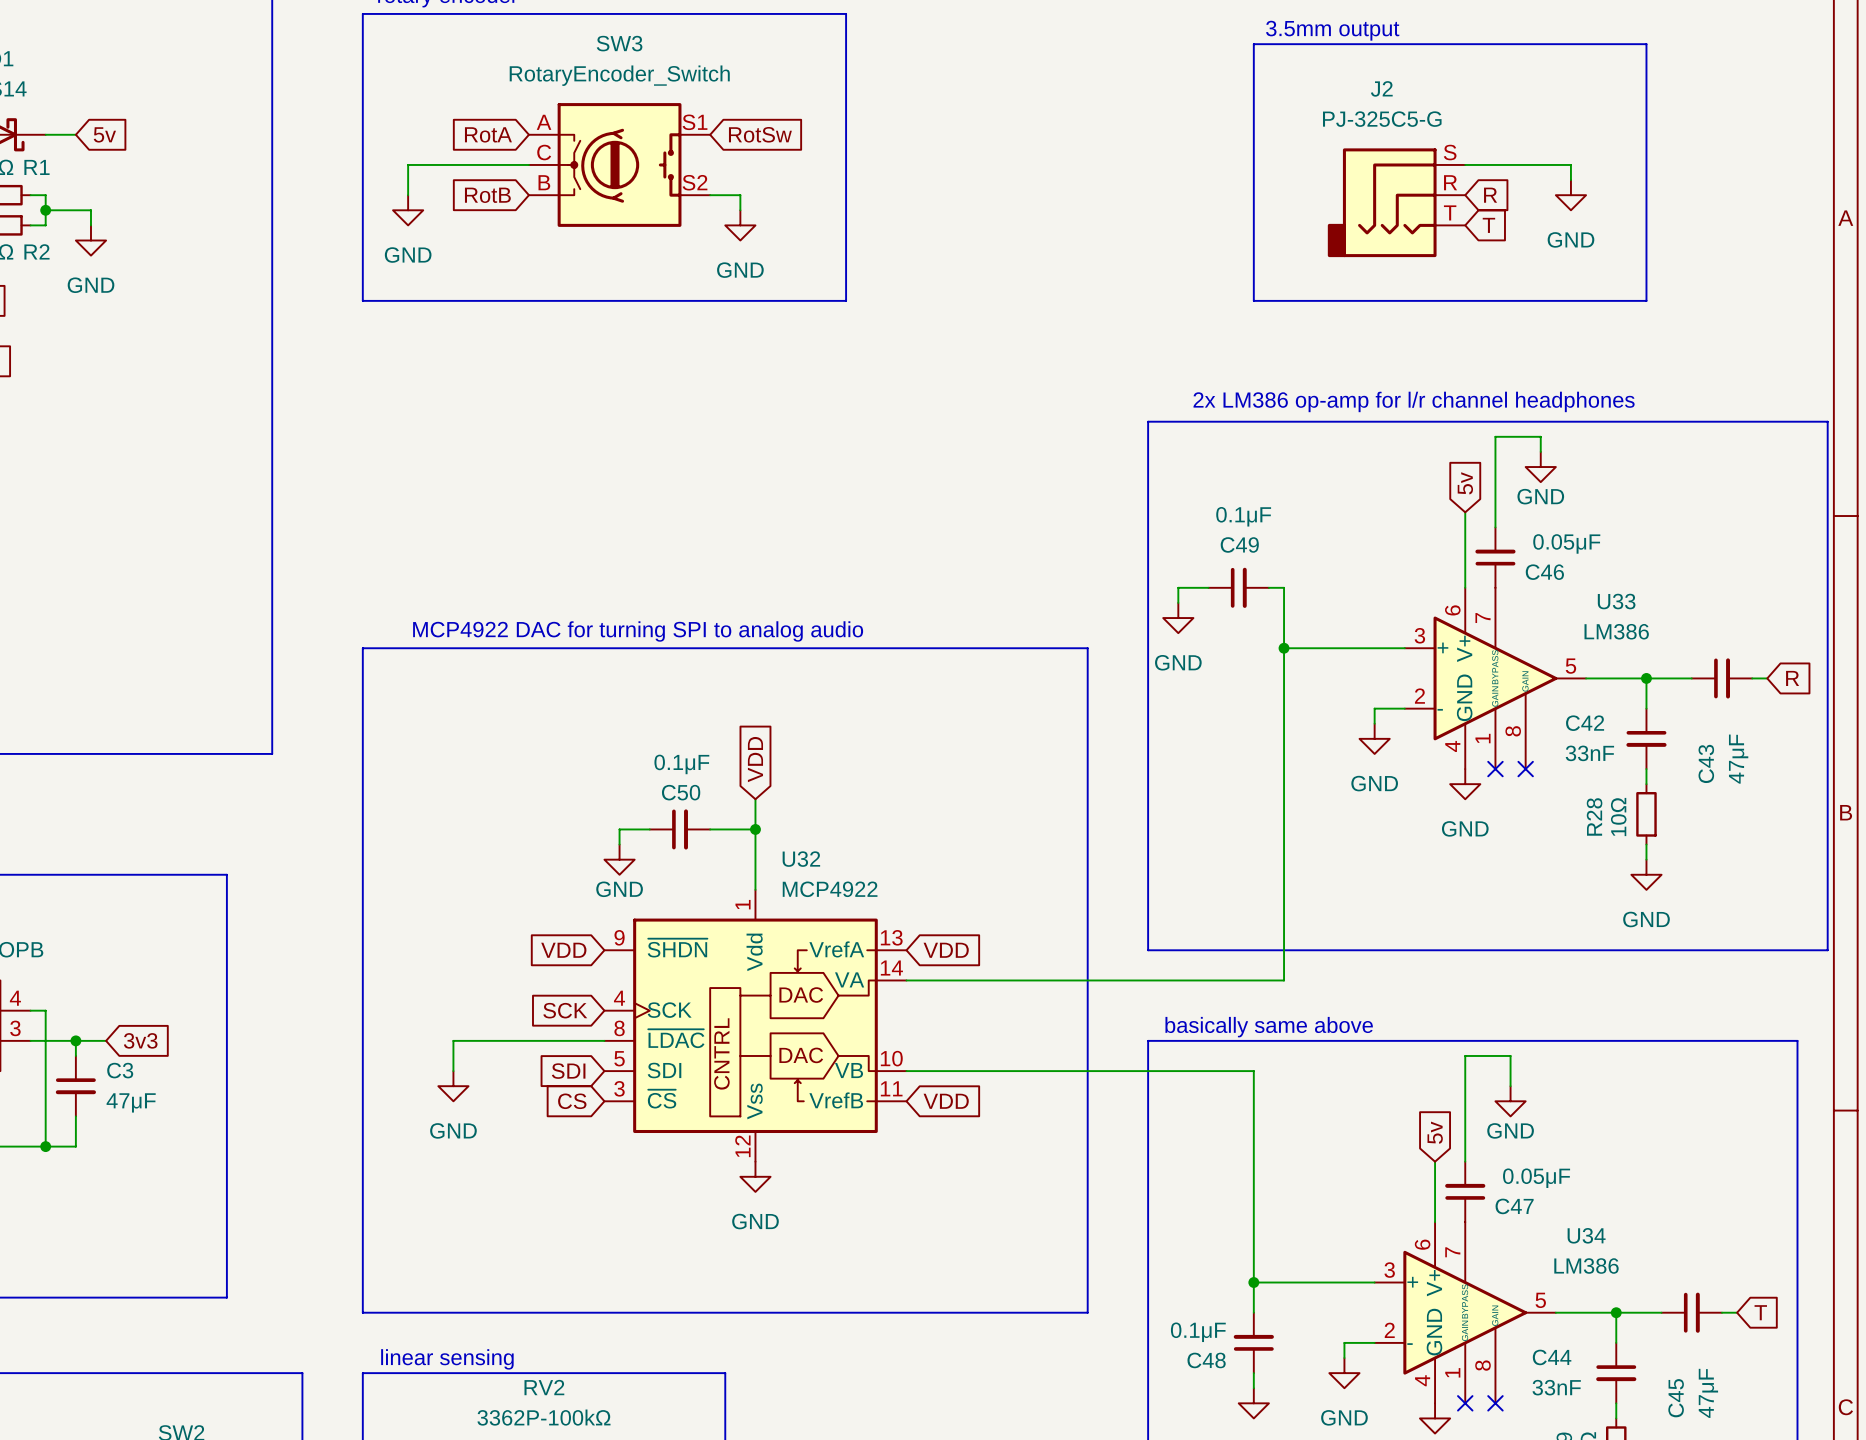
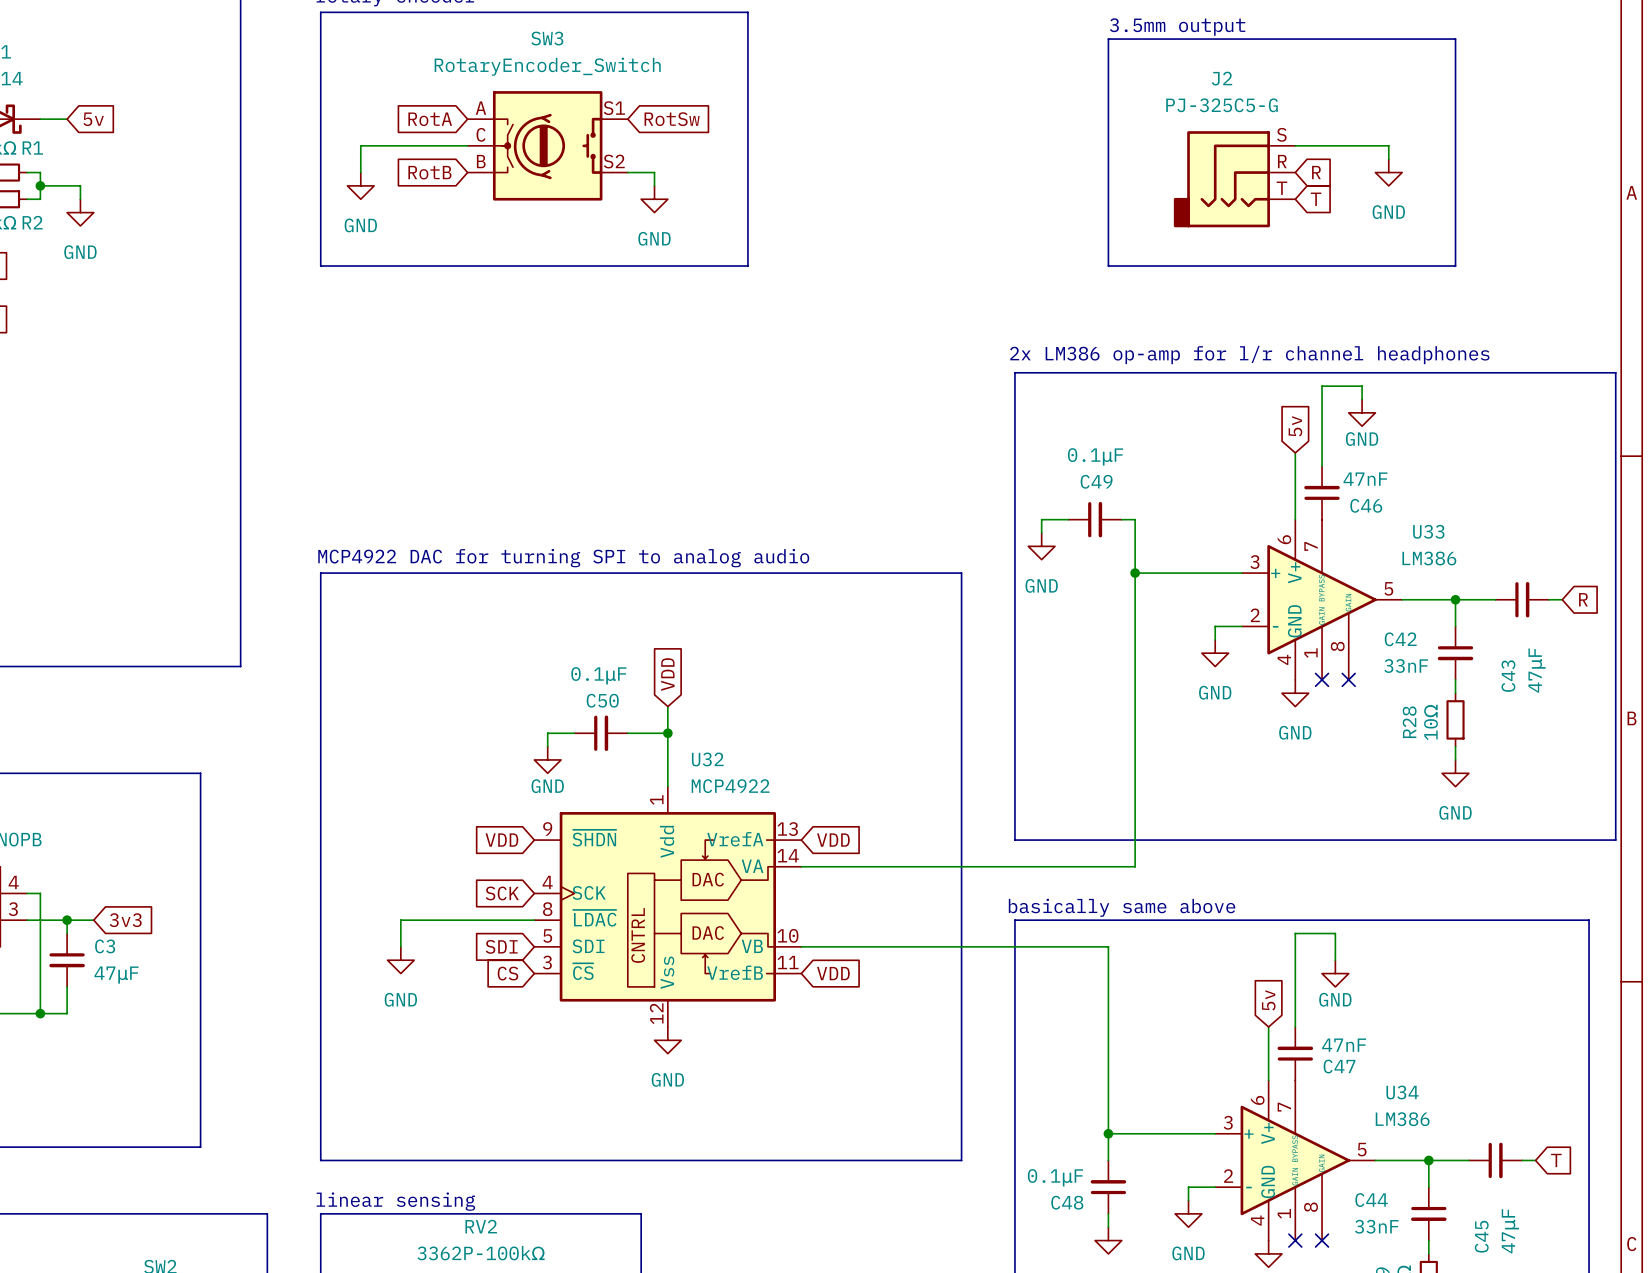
C46 value: 0.05μF (1566, 543) -> 47nF (1365, 479)
C47 value: 0.05μF (1536, 1178) -> 47nF (1344, 1045)

